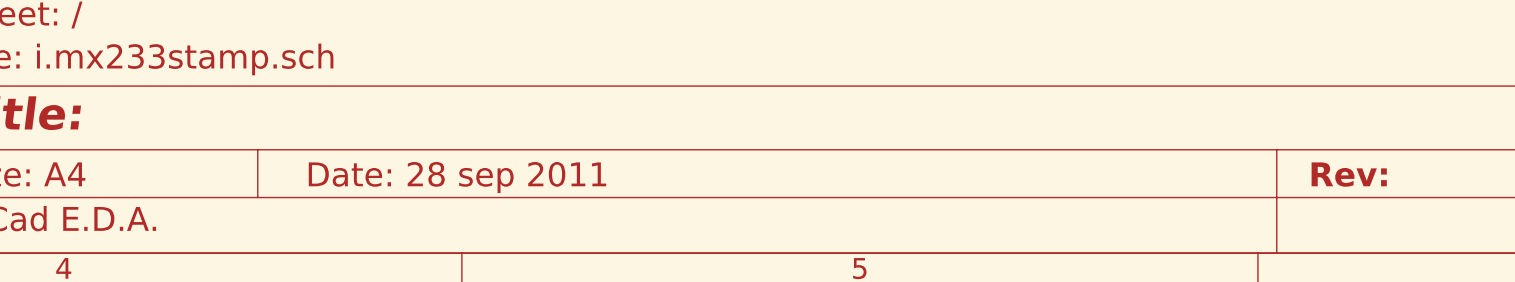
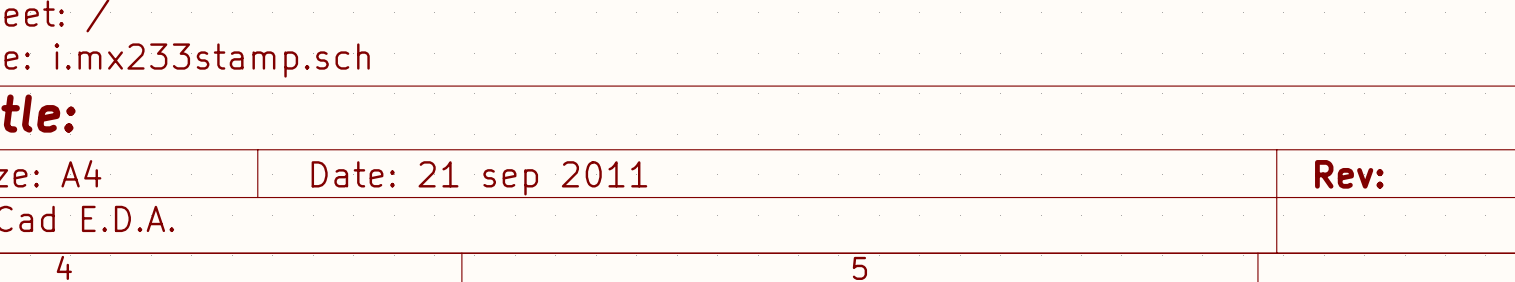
title block: Date: 28 sep 2011 (457, 177) -> Date: 21 sep 2011 (479, 178)

